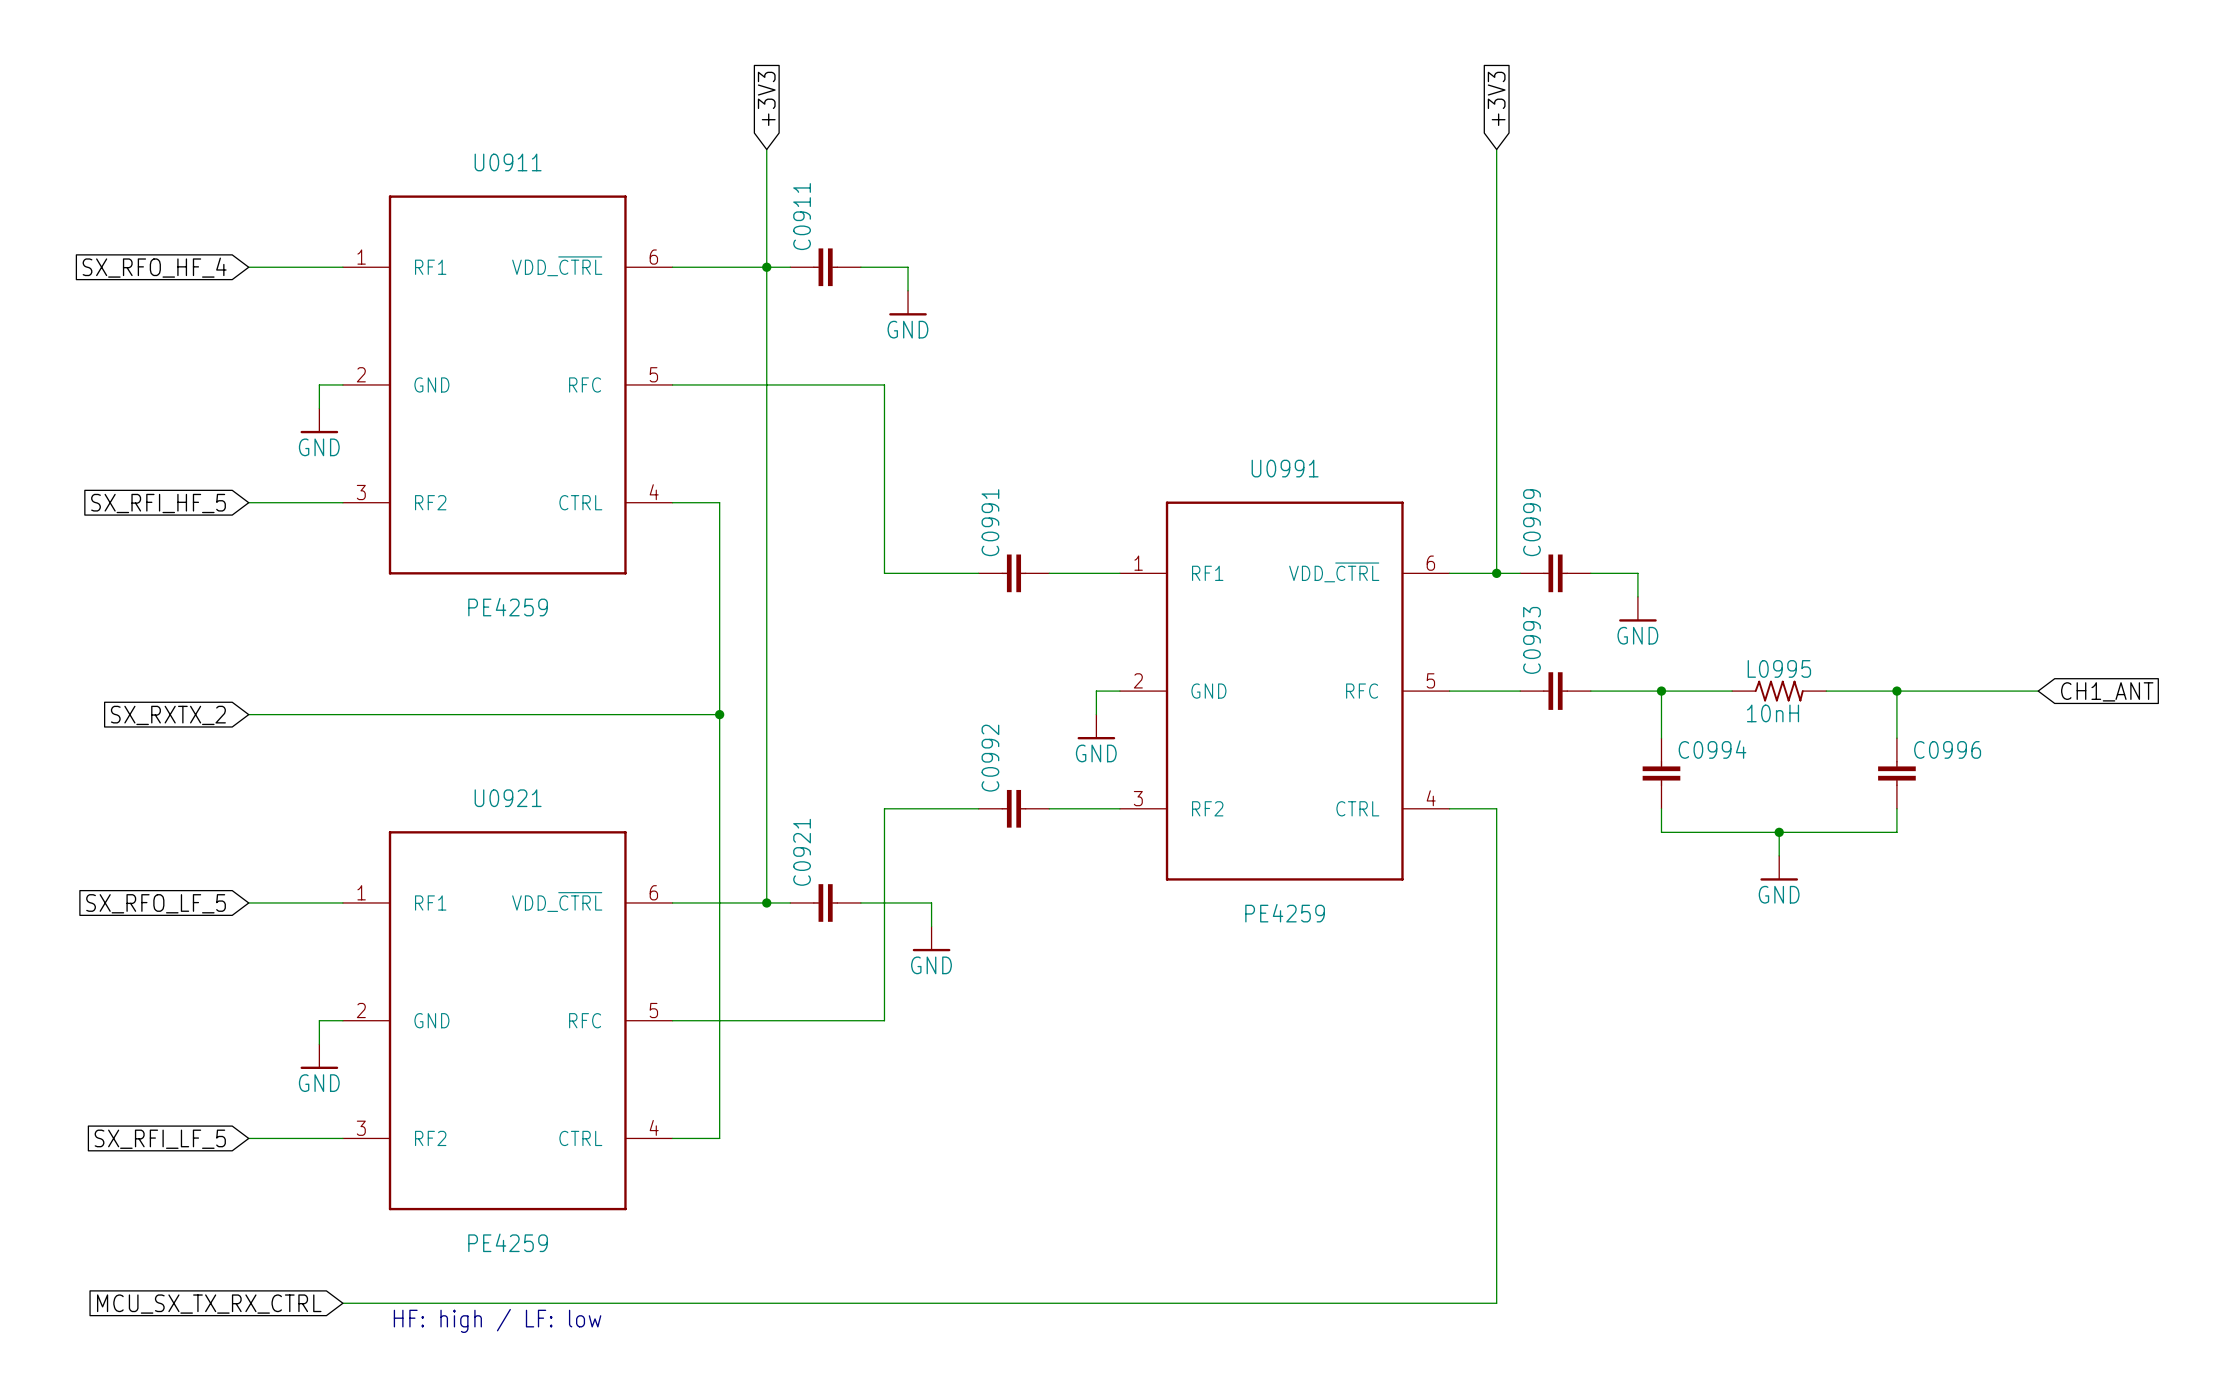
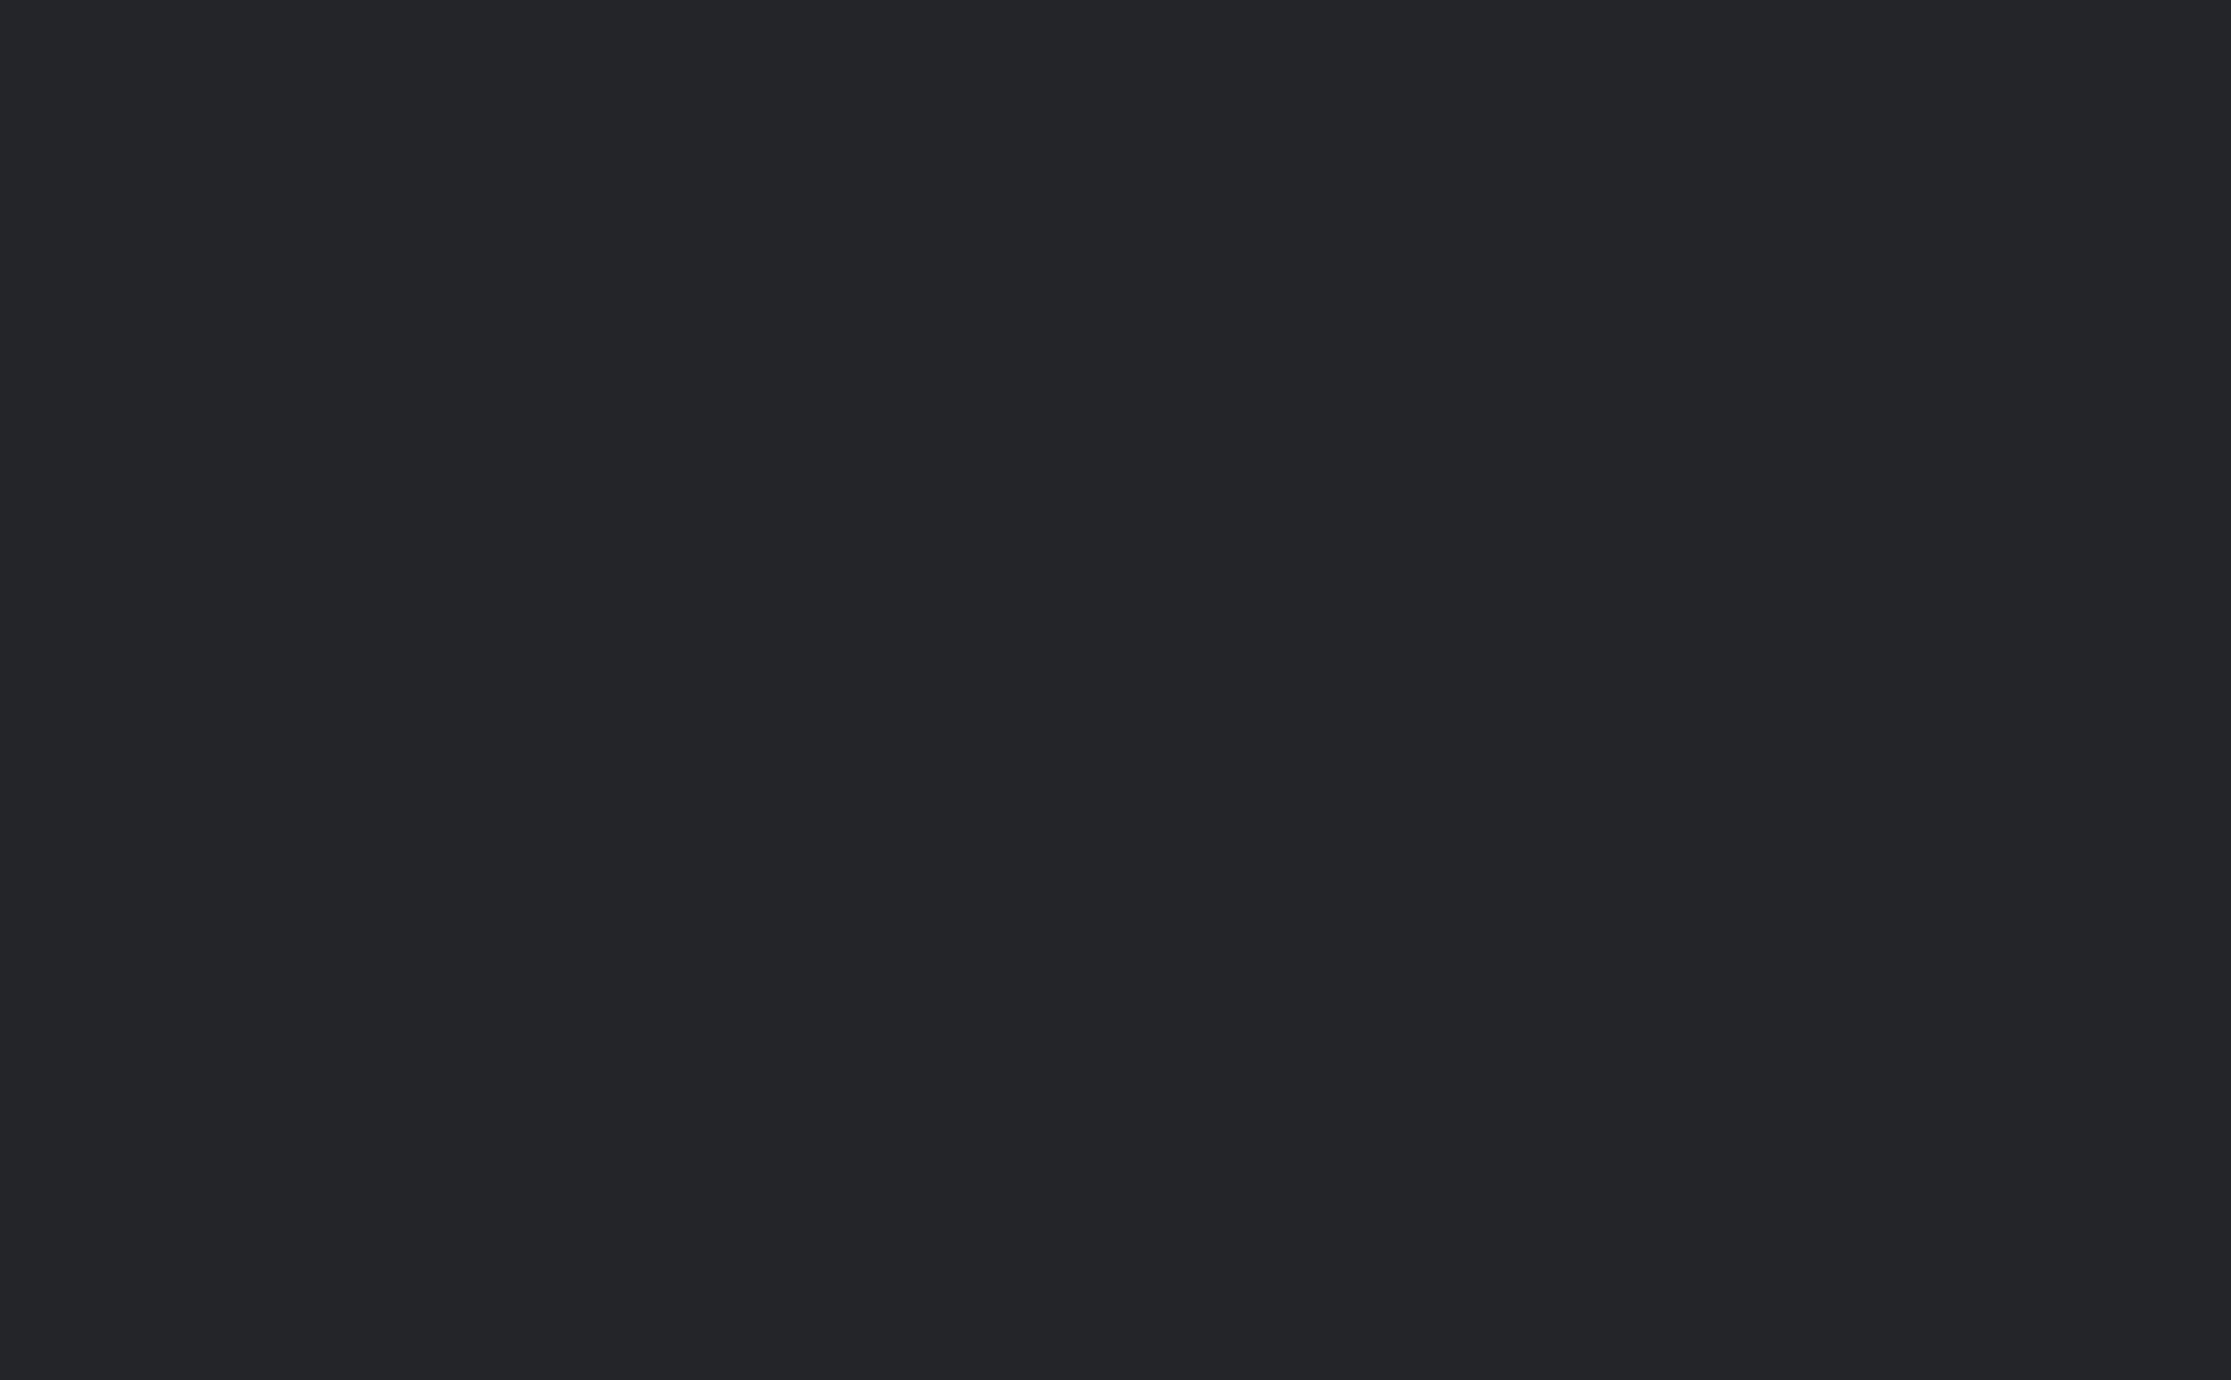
global label: +3V3 (766, 98) -> none
global label: +3V3 (1496, 98) -> none
wire: (766, 149) (766, 902) -> none
wire: (1496, 149) (1496, 573) -> none
global label: SX_RFO_HF_4 (154, 267) -> none
wire: (248, 267) (342, 267) -> none
wire: (672, 267) (790, 267) -> none
junction: (766, 267) -> none
C0911: (825, 267) -> none
wire: (860, 267) (908, 267) (908, 290) -> none
power symbol: GND (908, 303) -> none
wire: (342, 384) (319, 384) (319, 408) -> none
U0911: PE4259 (507, 384) -> none
wire: (672, 384) (884, 384) (884, 573) (978, 573) -> none
power symbol: GND (319, 420) -> none
wire: (248, 502) (342, 502) -> none
wire: (672, 502) (719, 502) (719, 1138) (672, 1138) -> none
global label: SX_RFI_HF_5 (158, 503) -> none
C0991: (1013, 573) -> none
wire: (1049, 573) (1119, 573) -> none
wire: (1449, 573) (1520, 573) -> none
junction: (1496, 573) -> none
C0999: (1555, 573) -> none
wire: (1590, 573) (1637, 573) (1637, 596) -> none
power symbol: GND (1637, 609) -> none
wire: (1119, 691) (1096, 691) (1096, 714) -> none
U0991: PE4259 (1284, 691) -> none
wire: (1449, 691) (1520, 691) -> none
C0993: (1555, 691) -> none
wire: (1590, 691) (1732, 691) -> none
wire: (1661, 691) (1661, 738) -> none
junction: (1661, 691) -> none
L0995: 10nH (1779, 691) -> none
wire: (1826, 691) (2038, 691) -> none
wire: (1896, 691) (1896, 738) -> none
junction: (1896, 691) -> none
global label: CH1_ANT (2107, 691) -> none
wire: (248, 714) (719, 714) -> none
junction: (719, 714) -> none
global label: SX_RXTX_2 (168, 715) -> none
power symbol: GND (1096, 726) -> none
C0994: (1661, 773) -> none
C0996: (1896, 773) -> none
wire: (978, 808) (884, 808) (884, 1020) (672, 1020) -> none
C0992: (1013, 808) -> none
wire: (1049, 808) (1119, 808) -> none
wire: (1449, 808) (1496, 808) (1496, 1303) (342, 1303) -> none
wire: (1661, 808) (1661, 832) (1896, 832) (1896, 808) -> none
wire: (1779, 832) (1779, 855) -> none
junction: (1779, 832) -> none
power symbol: GND (1779, 868) -> none
wire: (248, 902) (342, 902) -> none
wire: (672, 902) (790, 902) -> none
junction: (766, 902) -> none
C0921: (825, 902) -> none
wire: (860, 902) (931, 902) (931, 926) -> none
global label: SX_RFO_LF_5 (156, 903) -> none
power symbol: GND (931, 938) -> none
wire: (342, 1020) (319, 1020) (319, 1044) -> none
U0921: PE4259 (507, 1020) -> none
power symbol: GND (319, 1056) -> none
wire: (248, 1138) (342, 1138) -> none
global label: SX_RFI_LF_5 (160, 1139) -> none
global label: MCU_SX_TX_RX_CTRL (209, 1304) -> none
text: HF: high / LF: low (497, 1320) -> none

